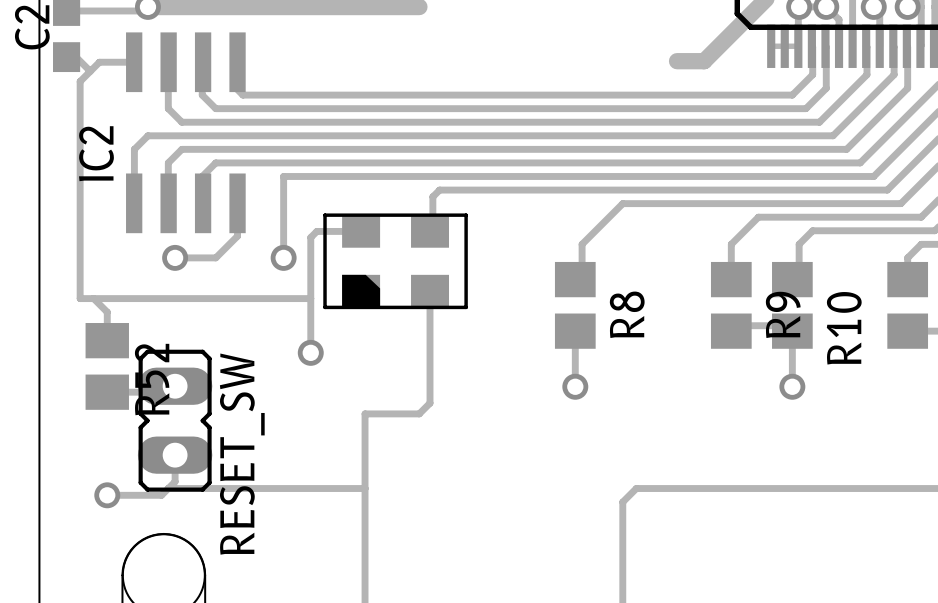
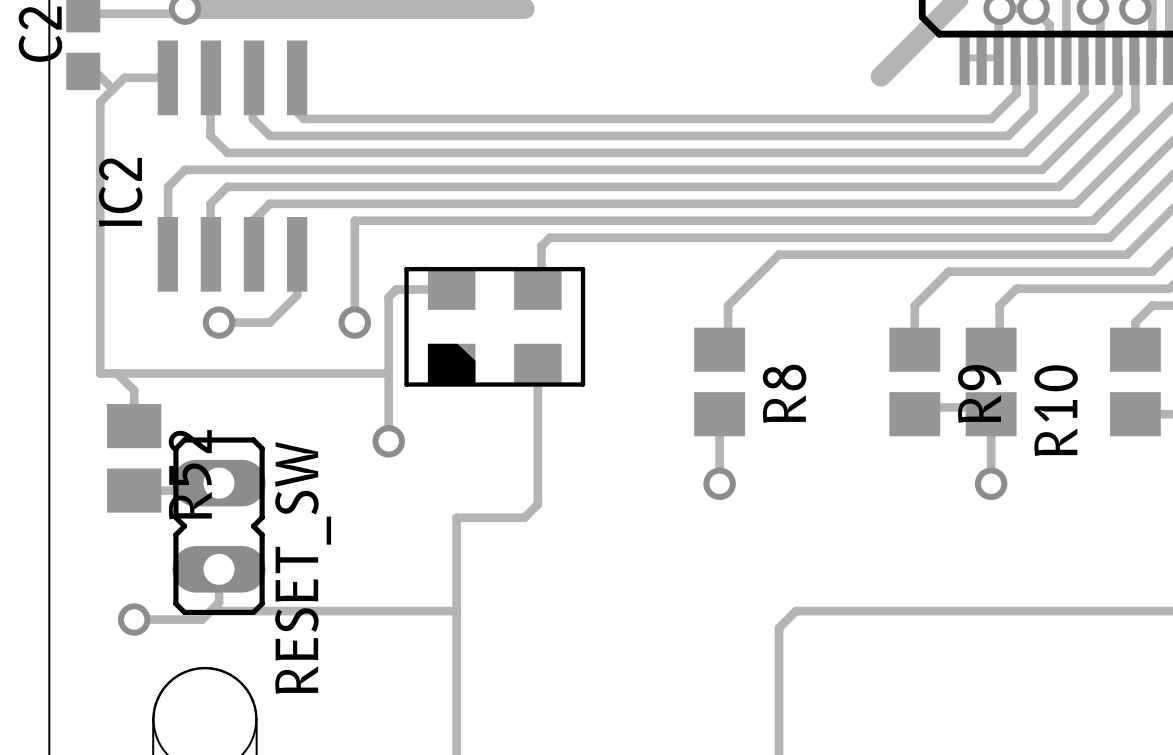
track: (677, 61) (704, 61) -> none

